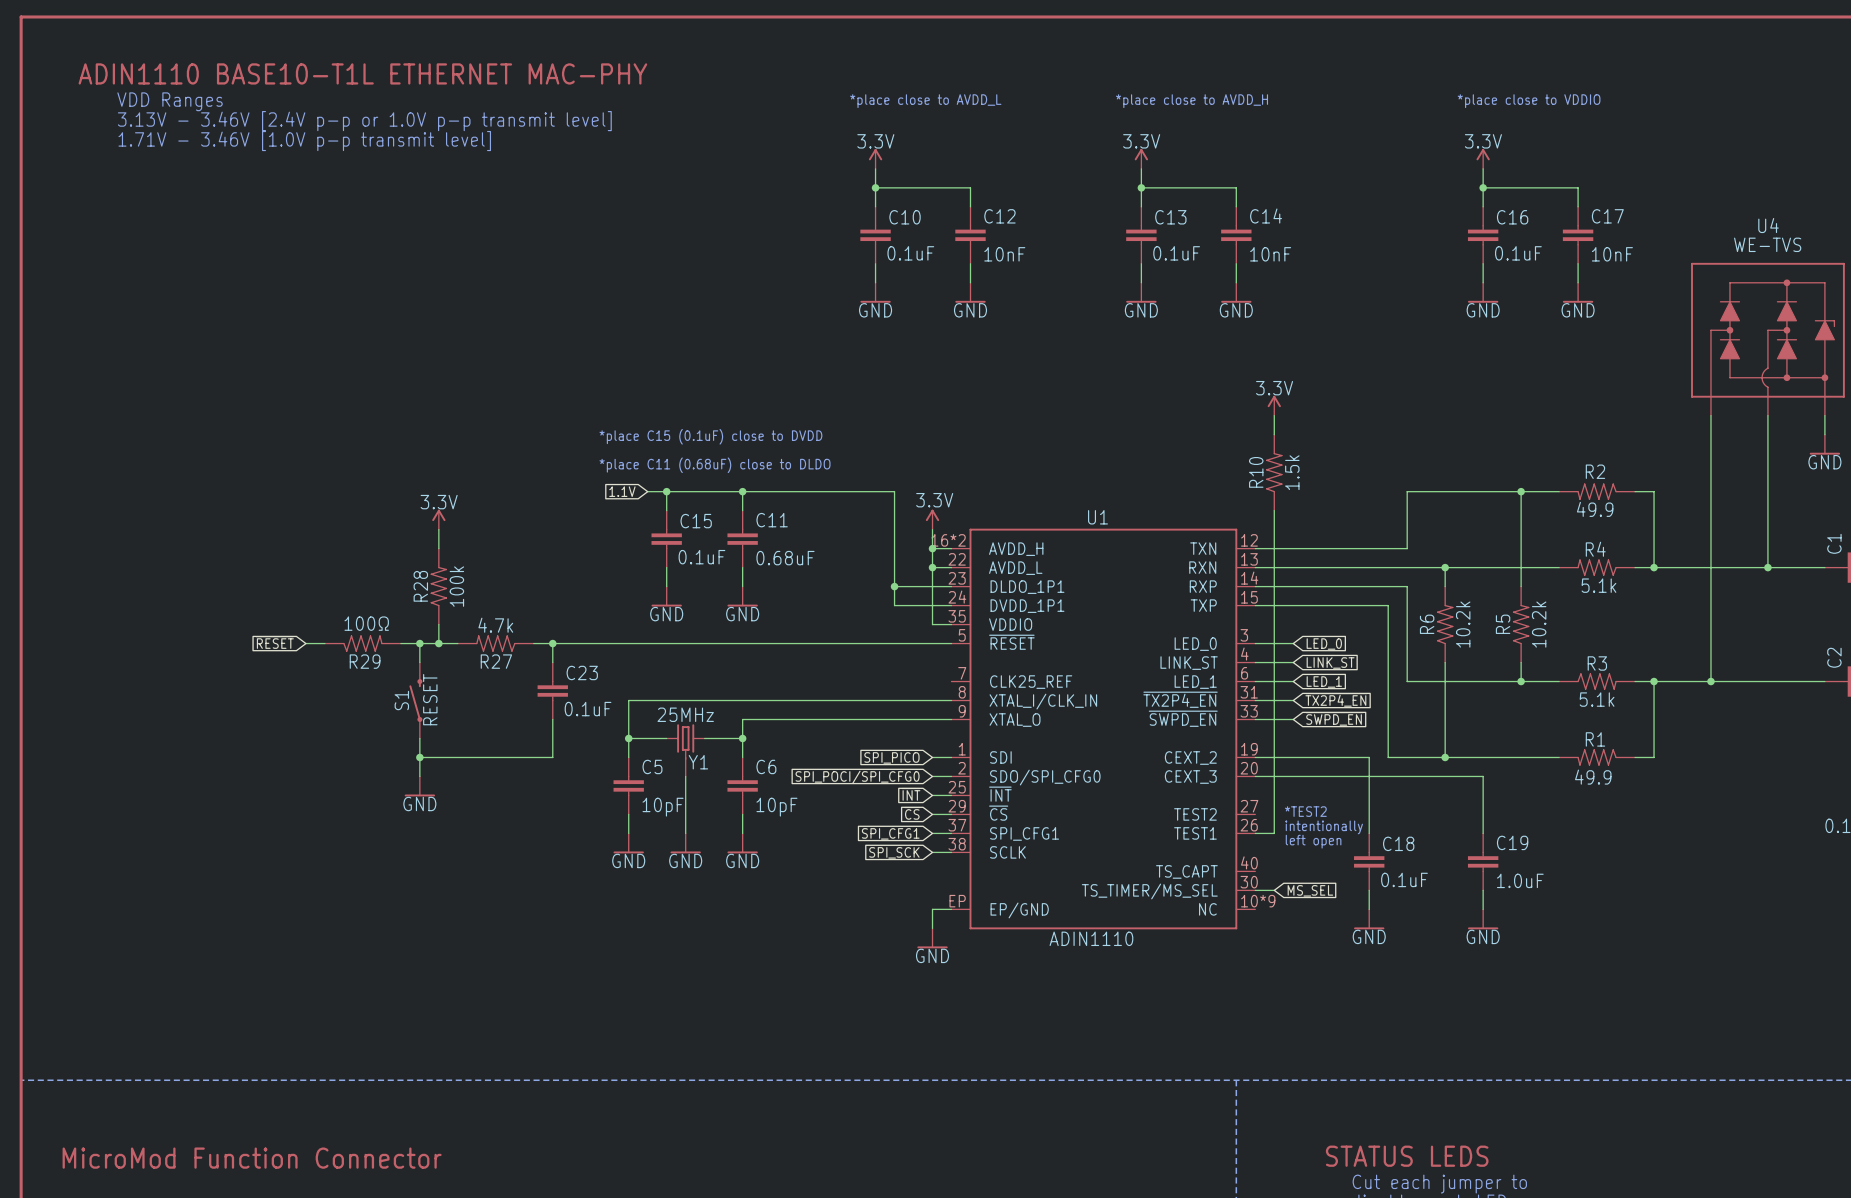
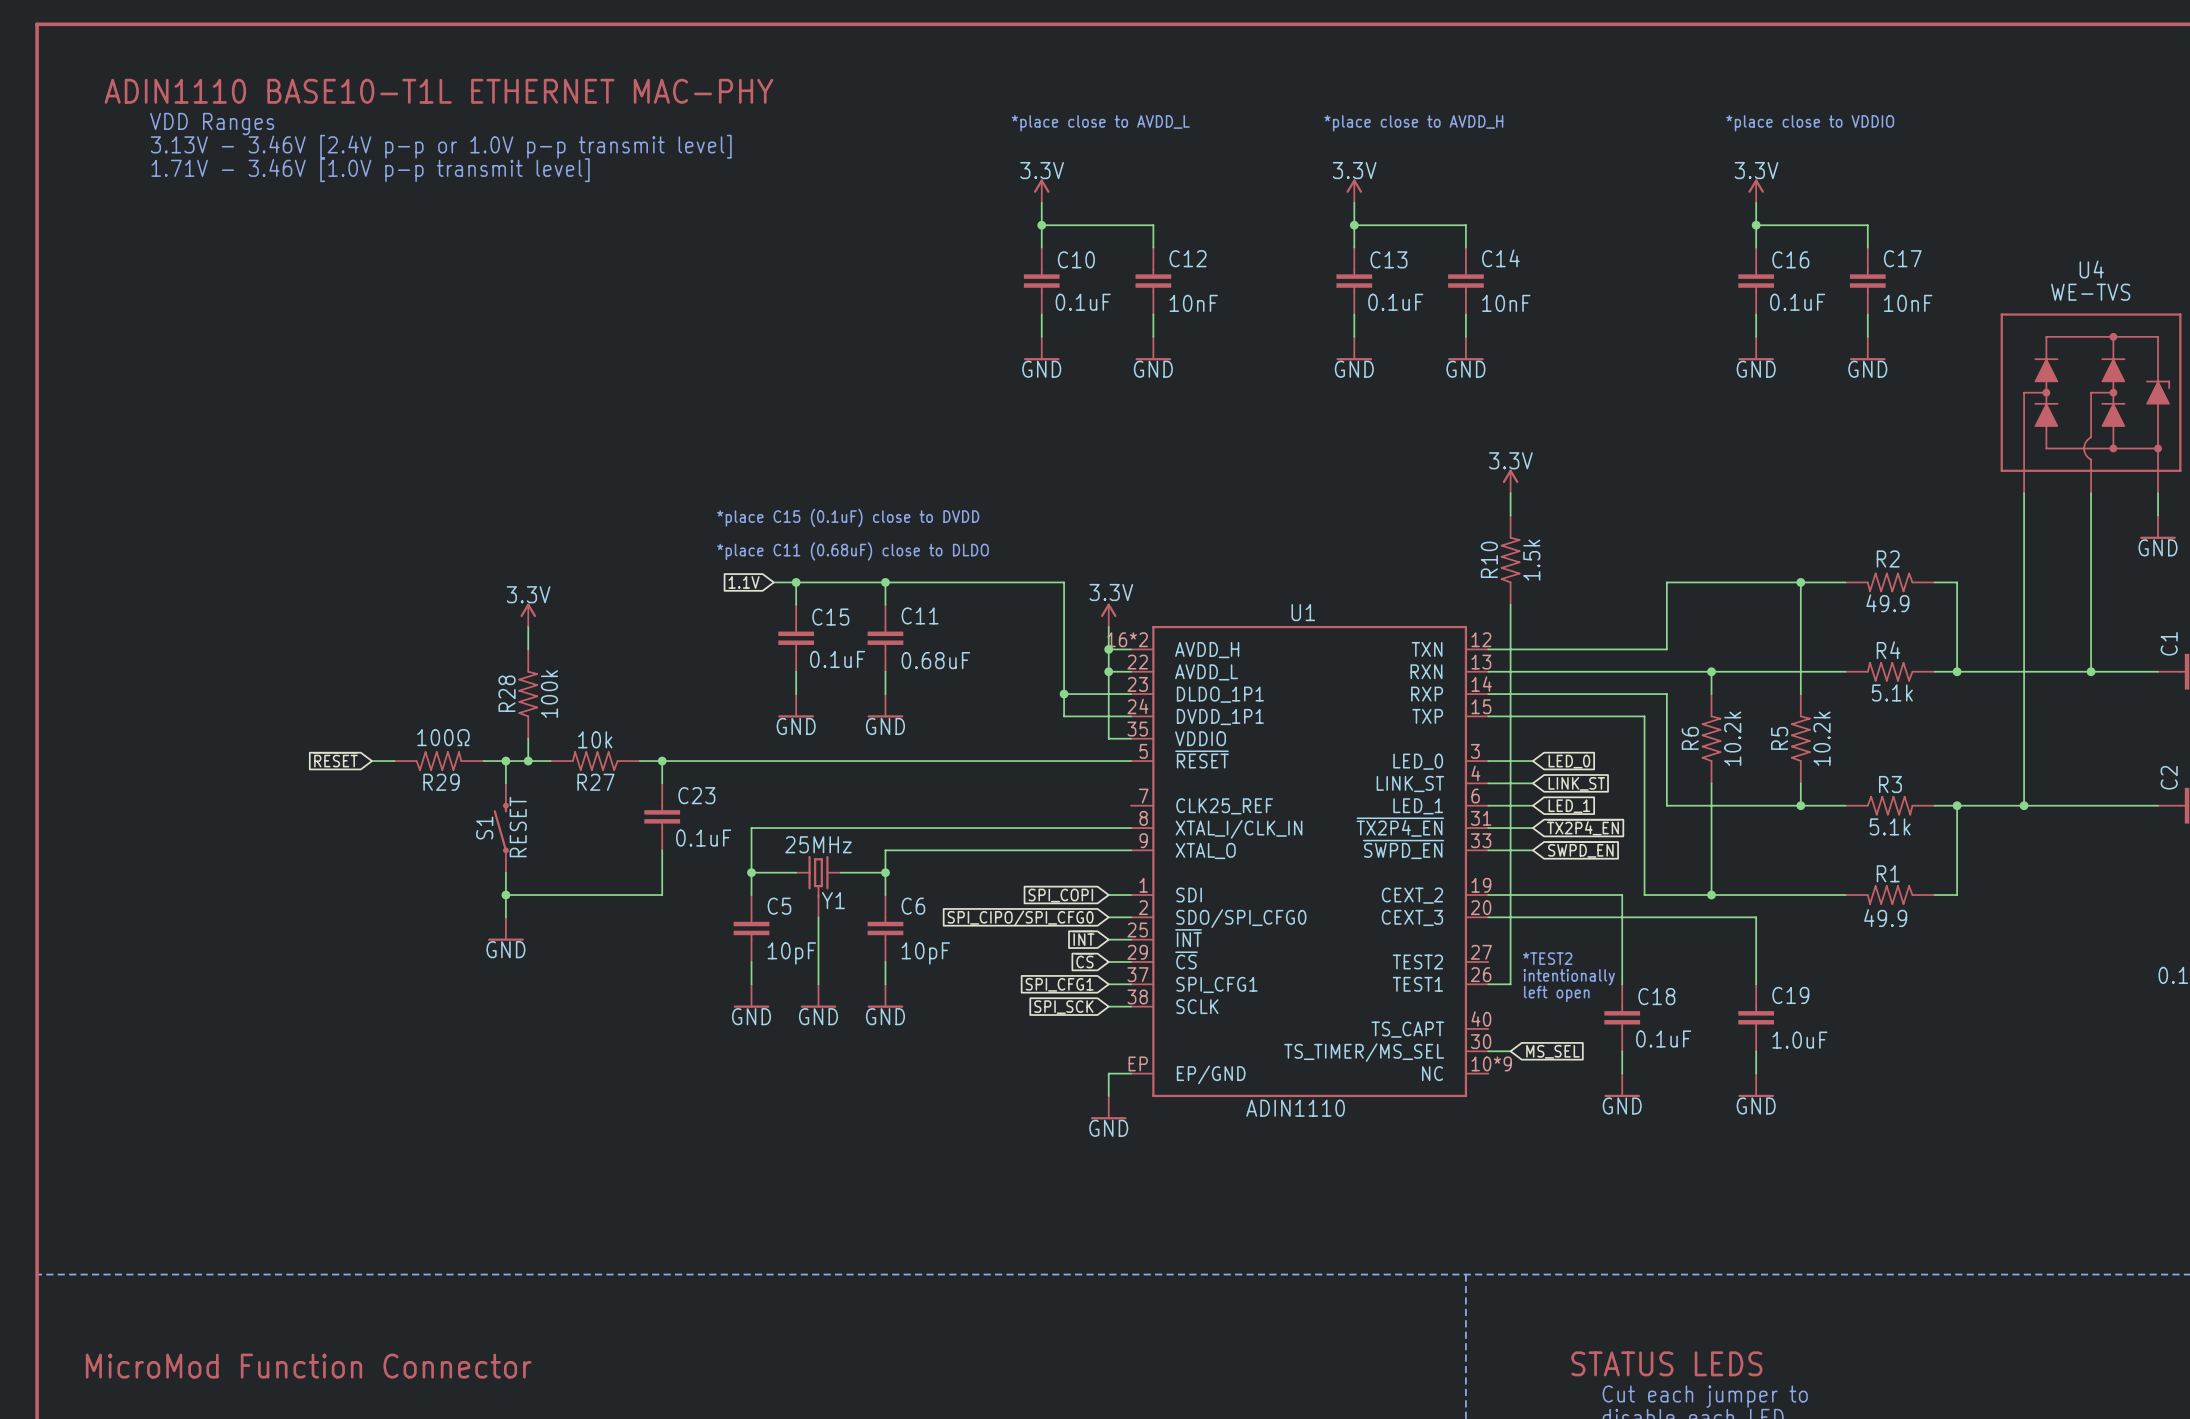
R27 value: 4.7k (495, 625) -> 10k (595, 739)
global label: SPI_PICO (891, 757) -> SPI_COPI (1060, 895)
global label: SPI_POCI/SPI_CFG0 (857, 777) -> SPI_CIPO/SPI_CFG0 (1020, 918)

